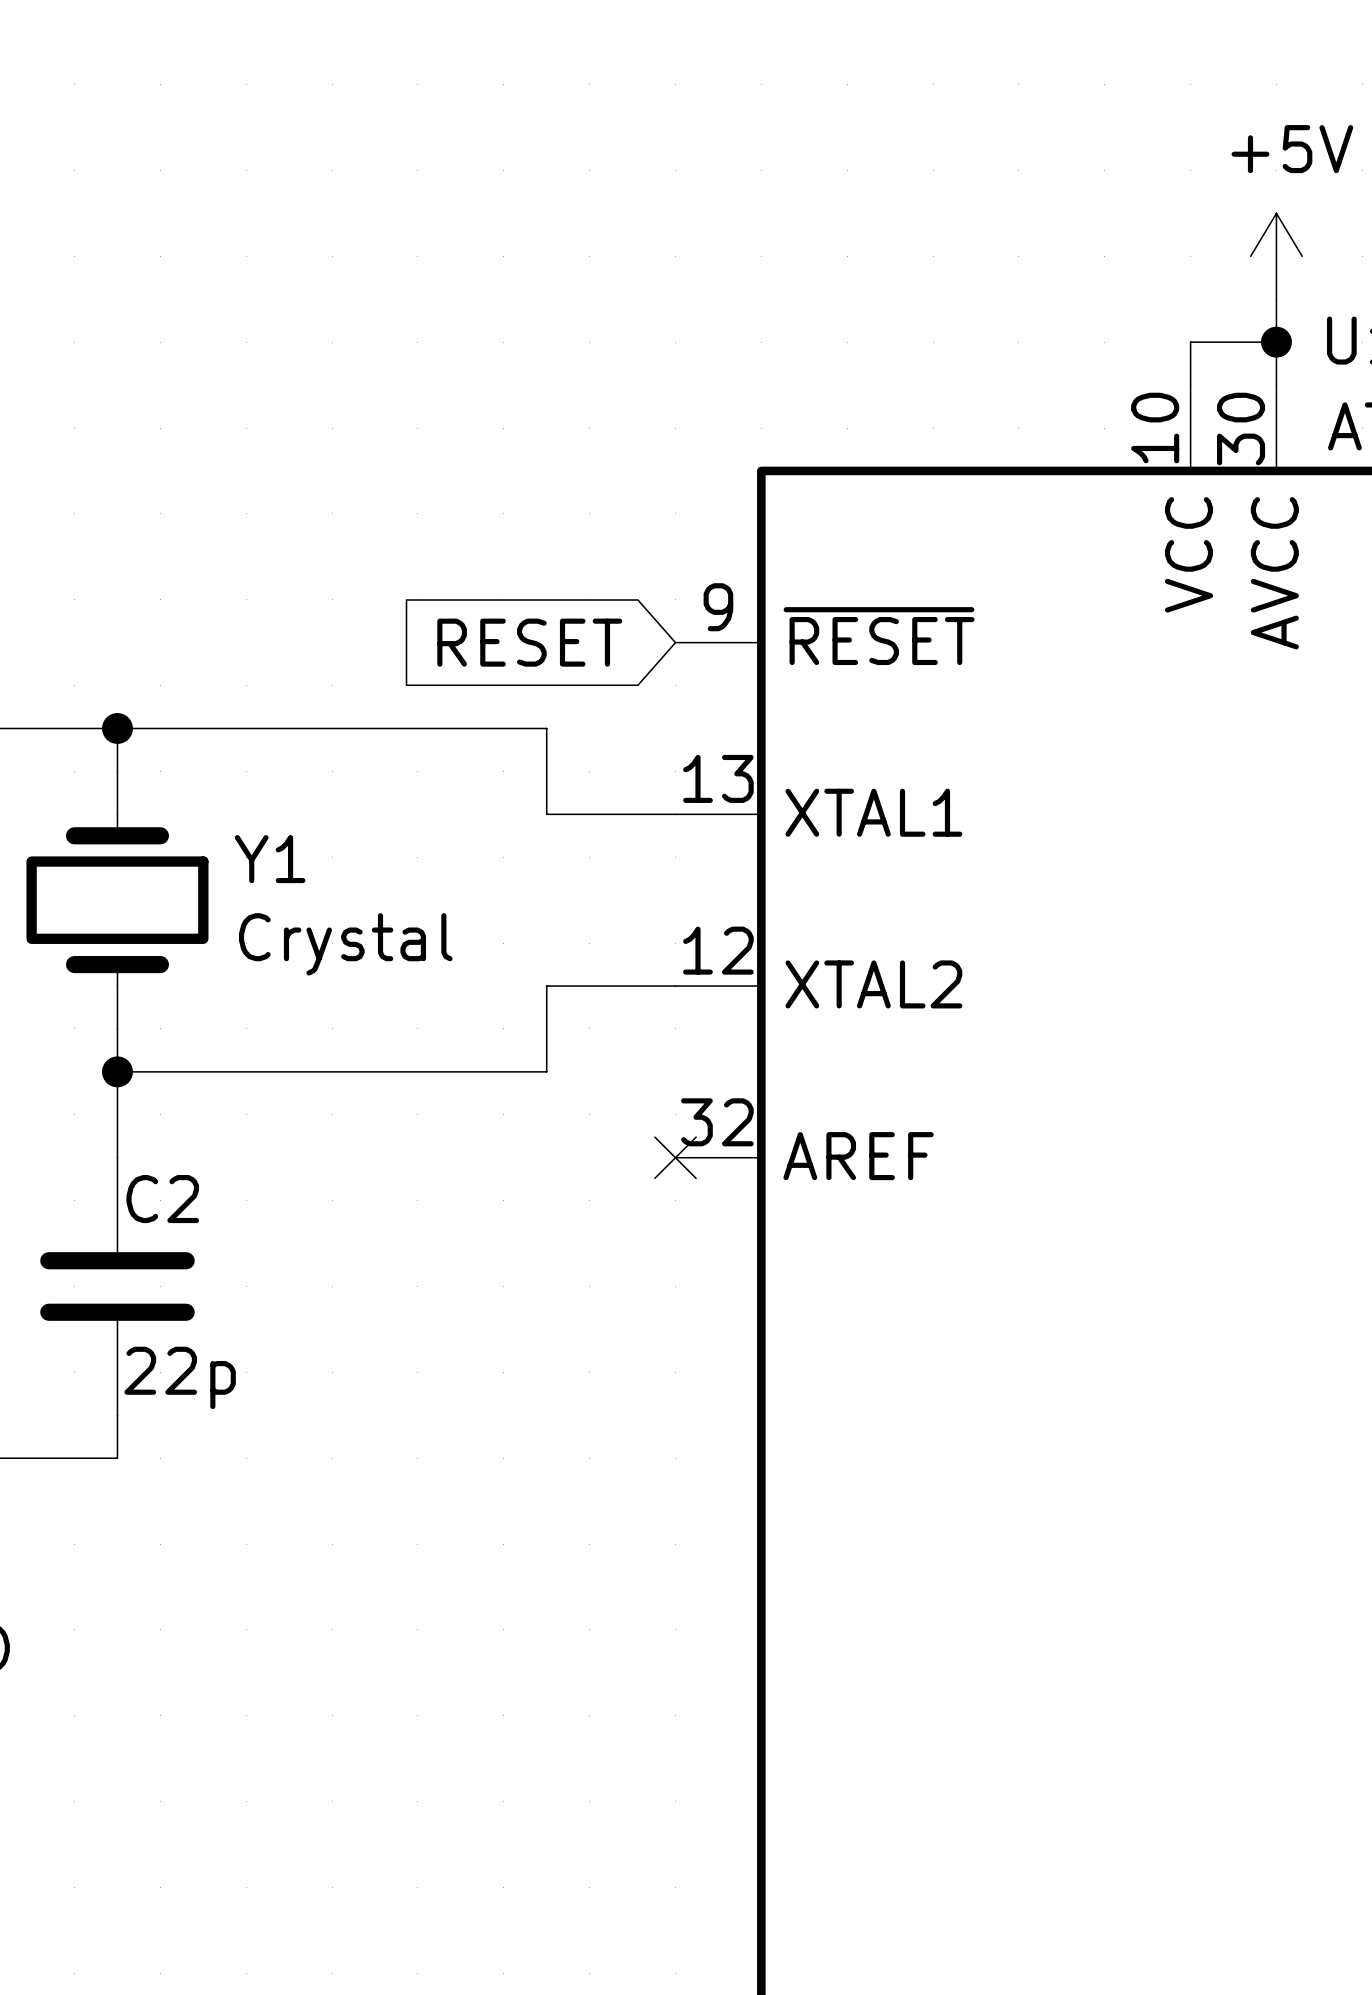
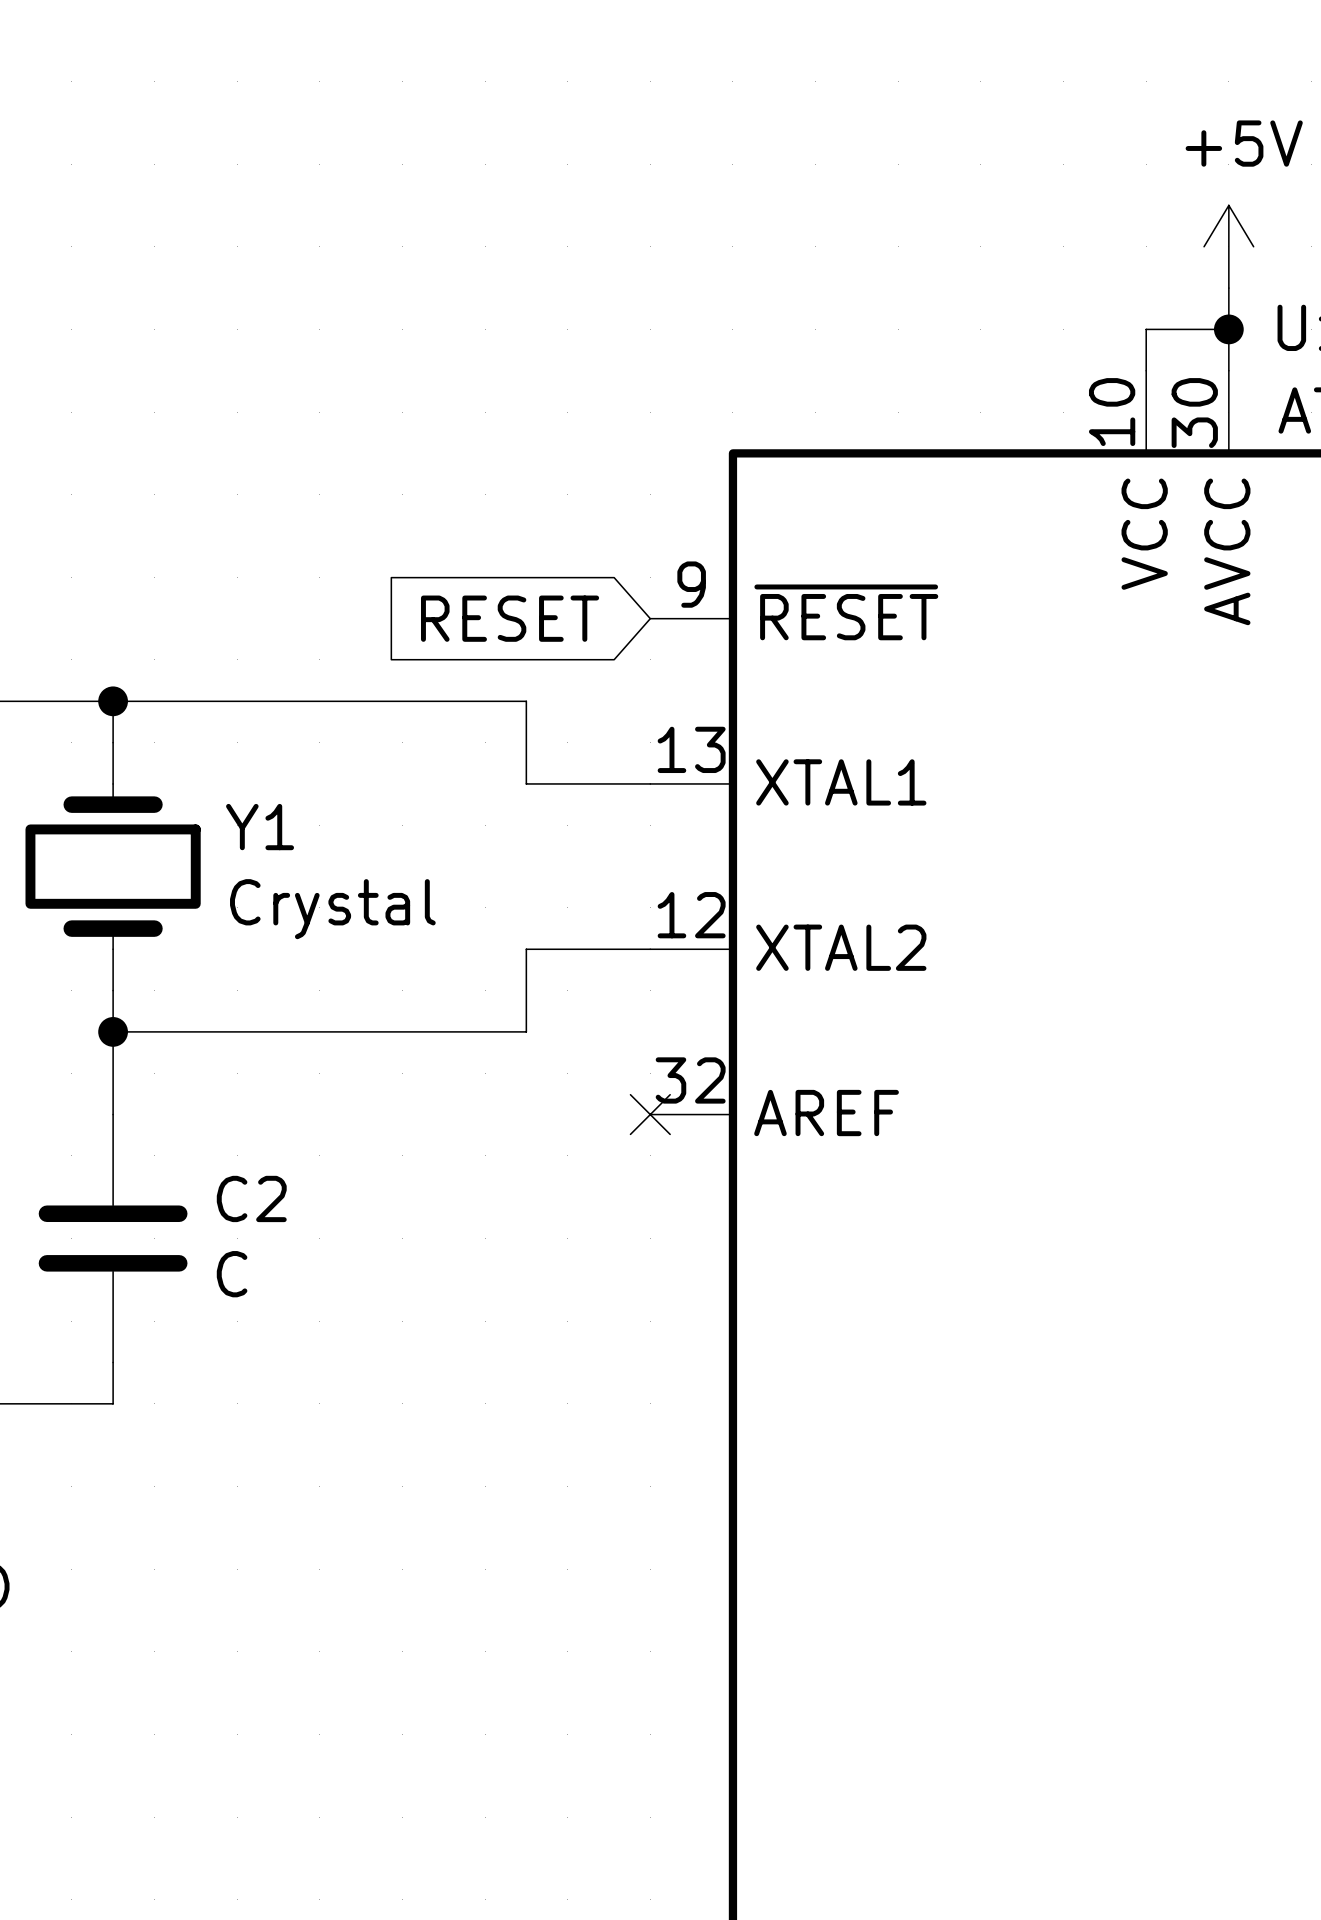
C2 name position: C2 (162, 1199) -> C2 (251, 1198)
C2 value: 22p (180, 1377) -> C (232, 1274)

